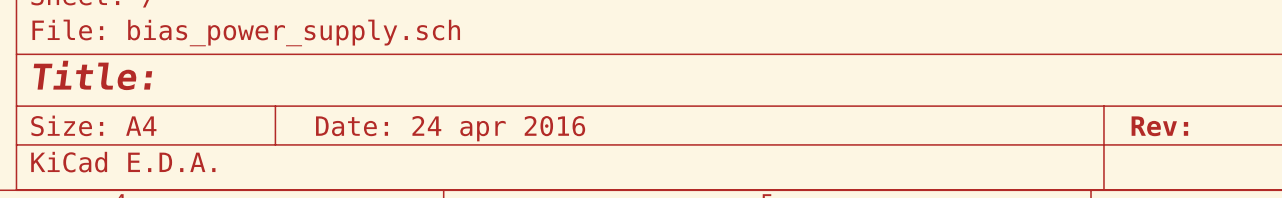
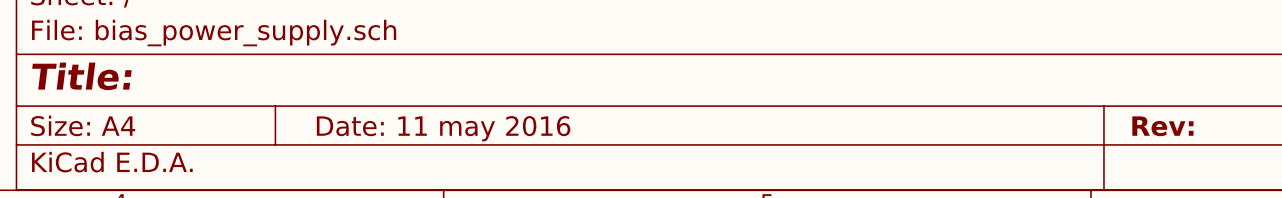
title block: Date: 24 apr 2016 (450, 128) -> Date: 11 may 2016 (443, 128)

